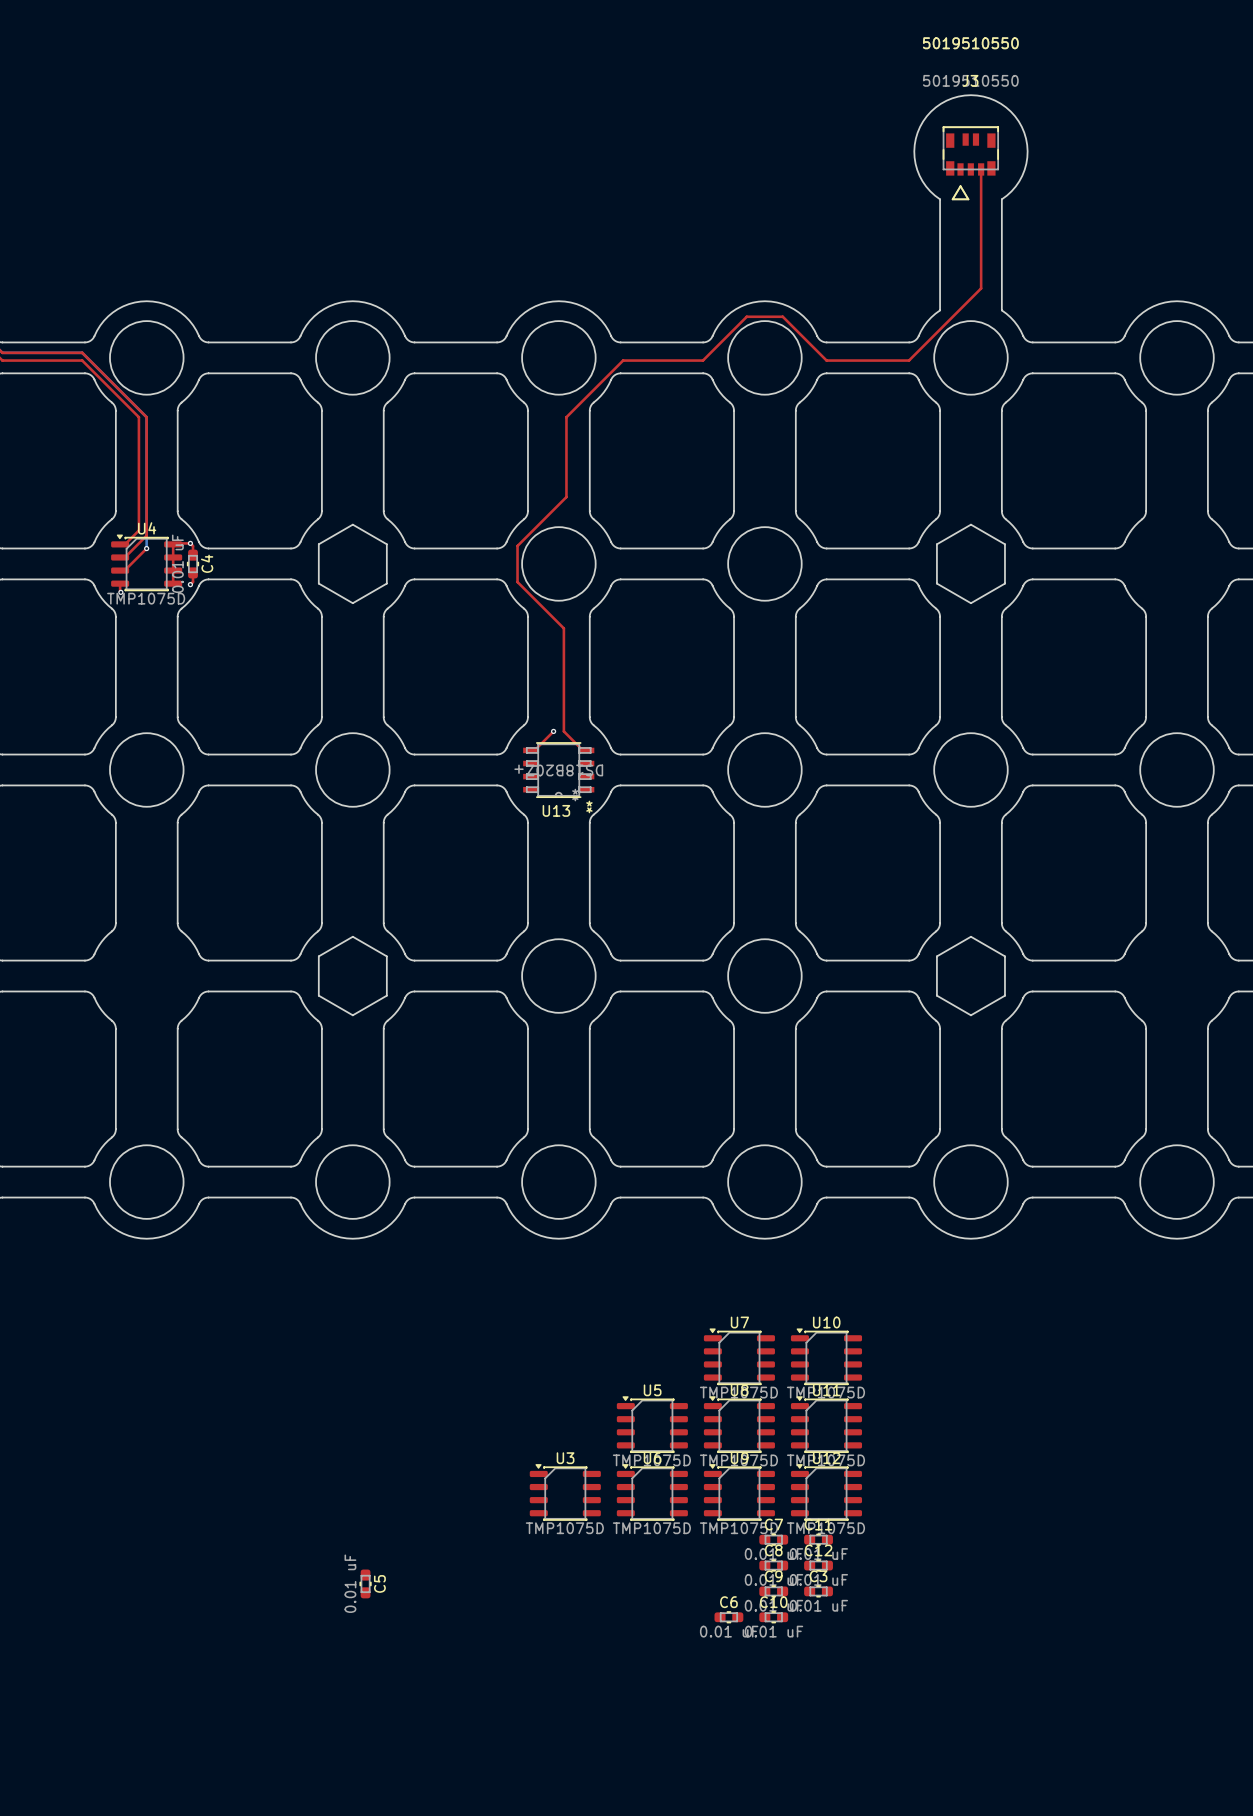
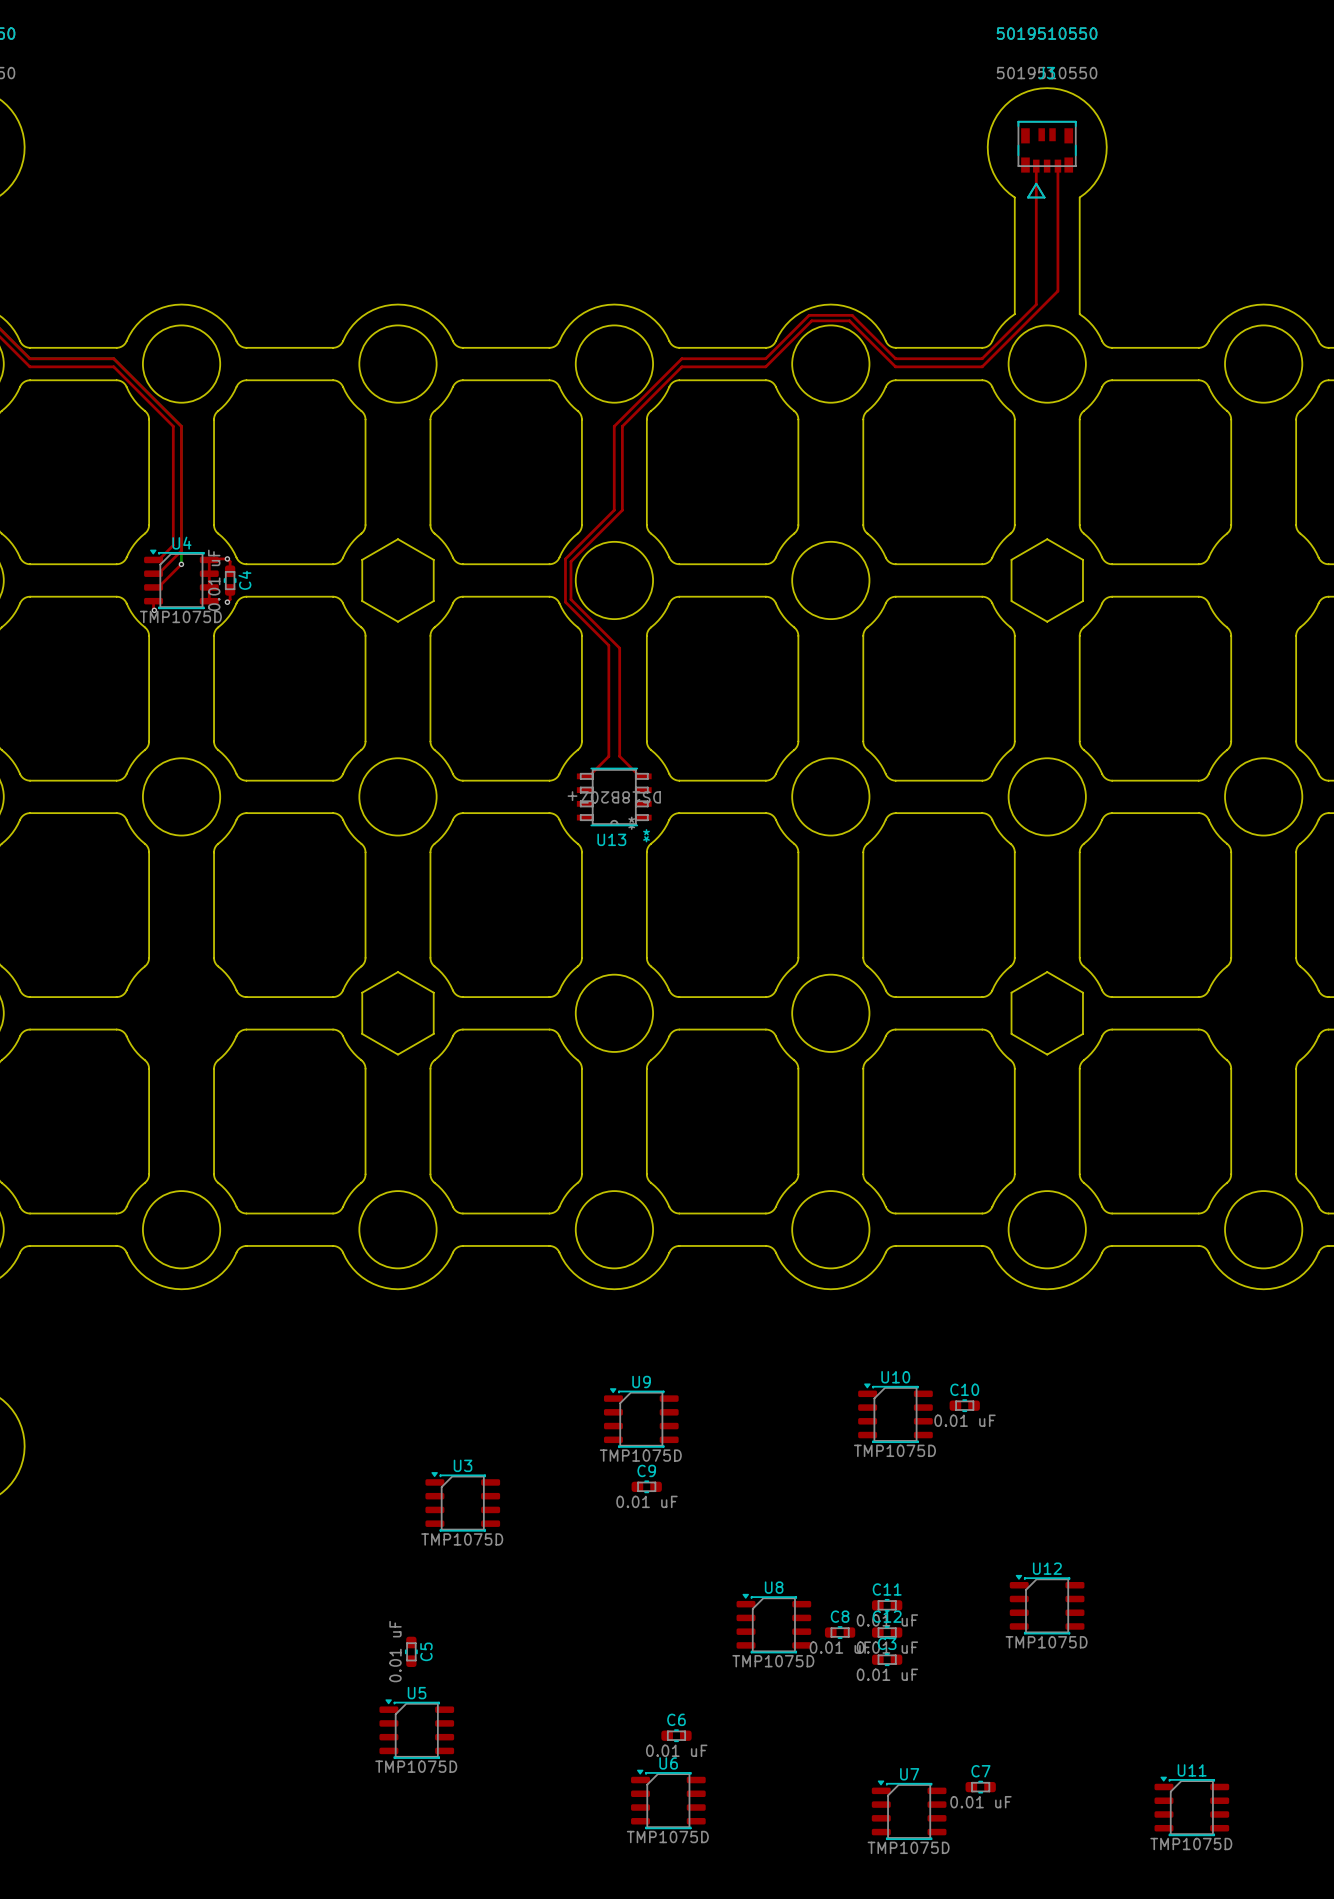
top track: none -> (1036, 166) (1036, 304) (982, 358) (895, 358) (852, 315) (809, 315) (765, 358) (681, 358) (614, 426) (614, 510) (565, 559) (565, 602) (608, 645) (608, 756)
via: (553, 731) -> none
U7 position: (739, 1356) -> (909, 1810)
U5 position: (652, 1424) -> (416, 1729)
U8 position: (739, 1424) -> (773, 1623)
U11 position: (826, 1424) -> (1191, 1806)
U3 position: (565, 1492) -> (462, 1501)
U6 position: (652, 1492) -> (668, 1799)
U9 position: (739, 1492) -> (641, 1417)
U12 position: (826, 1492) -> (1047, 1604)
C7 position: (773, 1539) -> (980, 1787)
C9 position: (773, 1591) -> (646, 1486)
C6 position: (728, 1617) -> (676, 1735)
C10 position: (773, 1617) -> (964, 1405)

